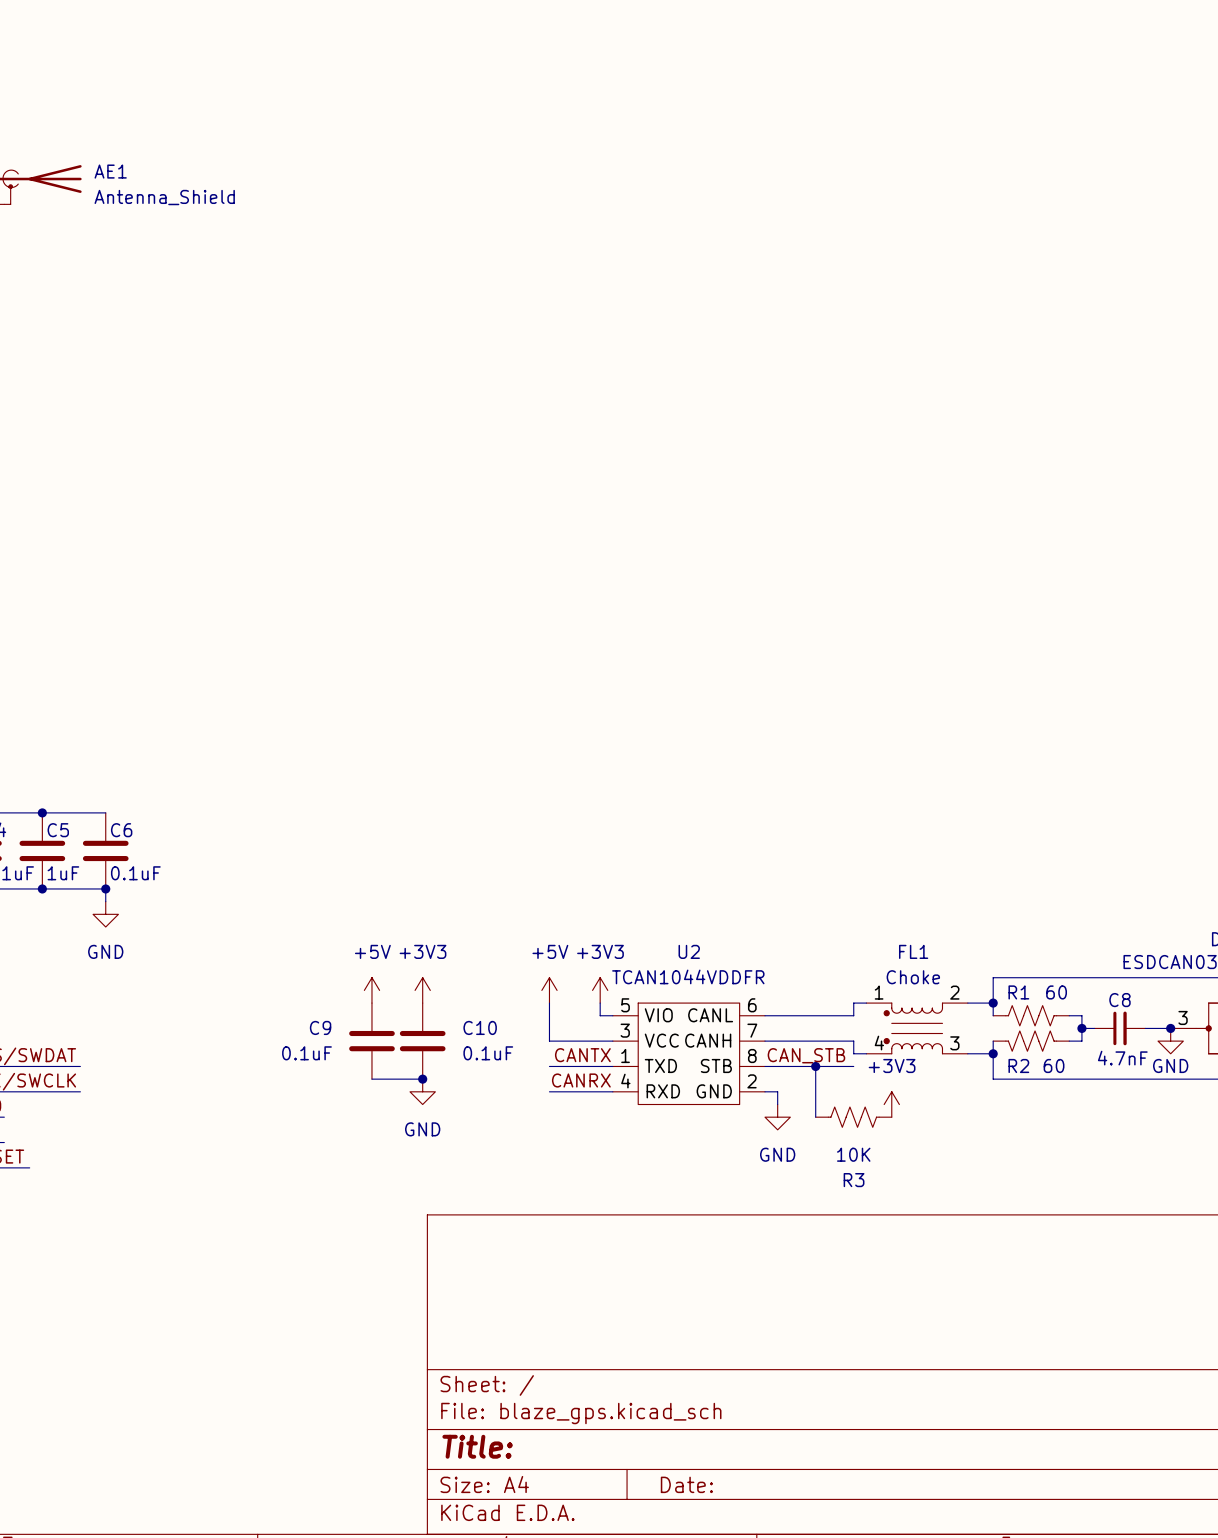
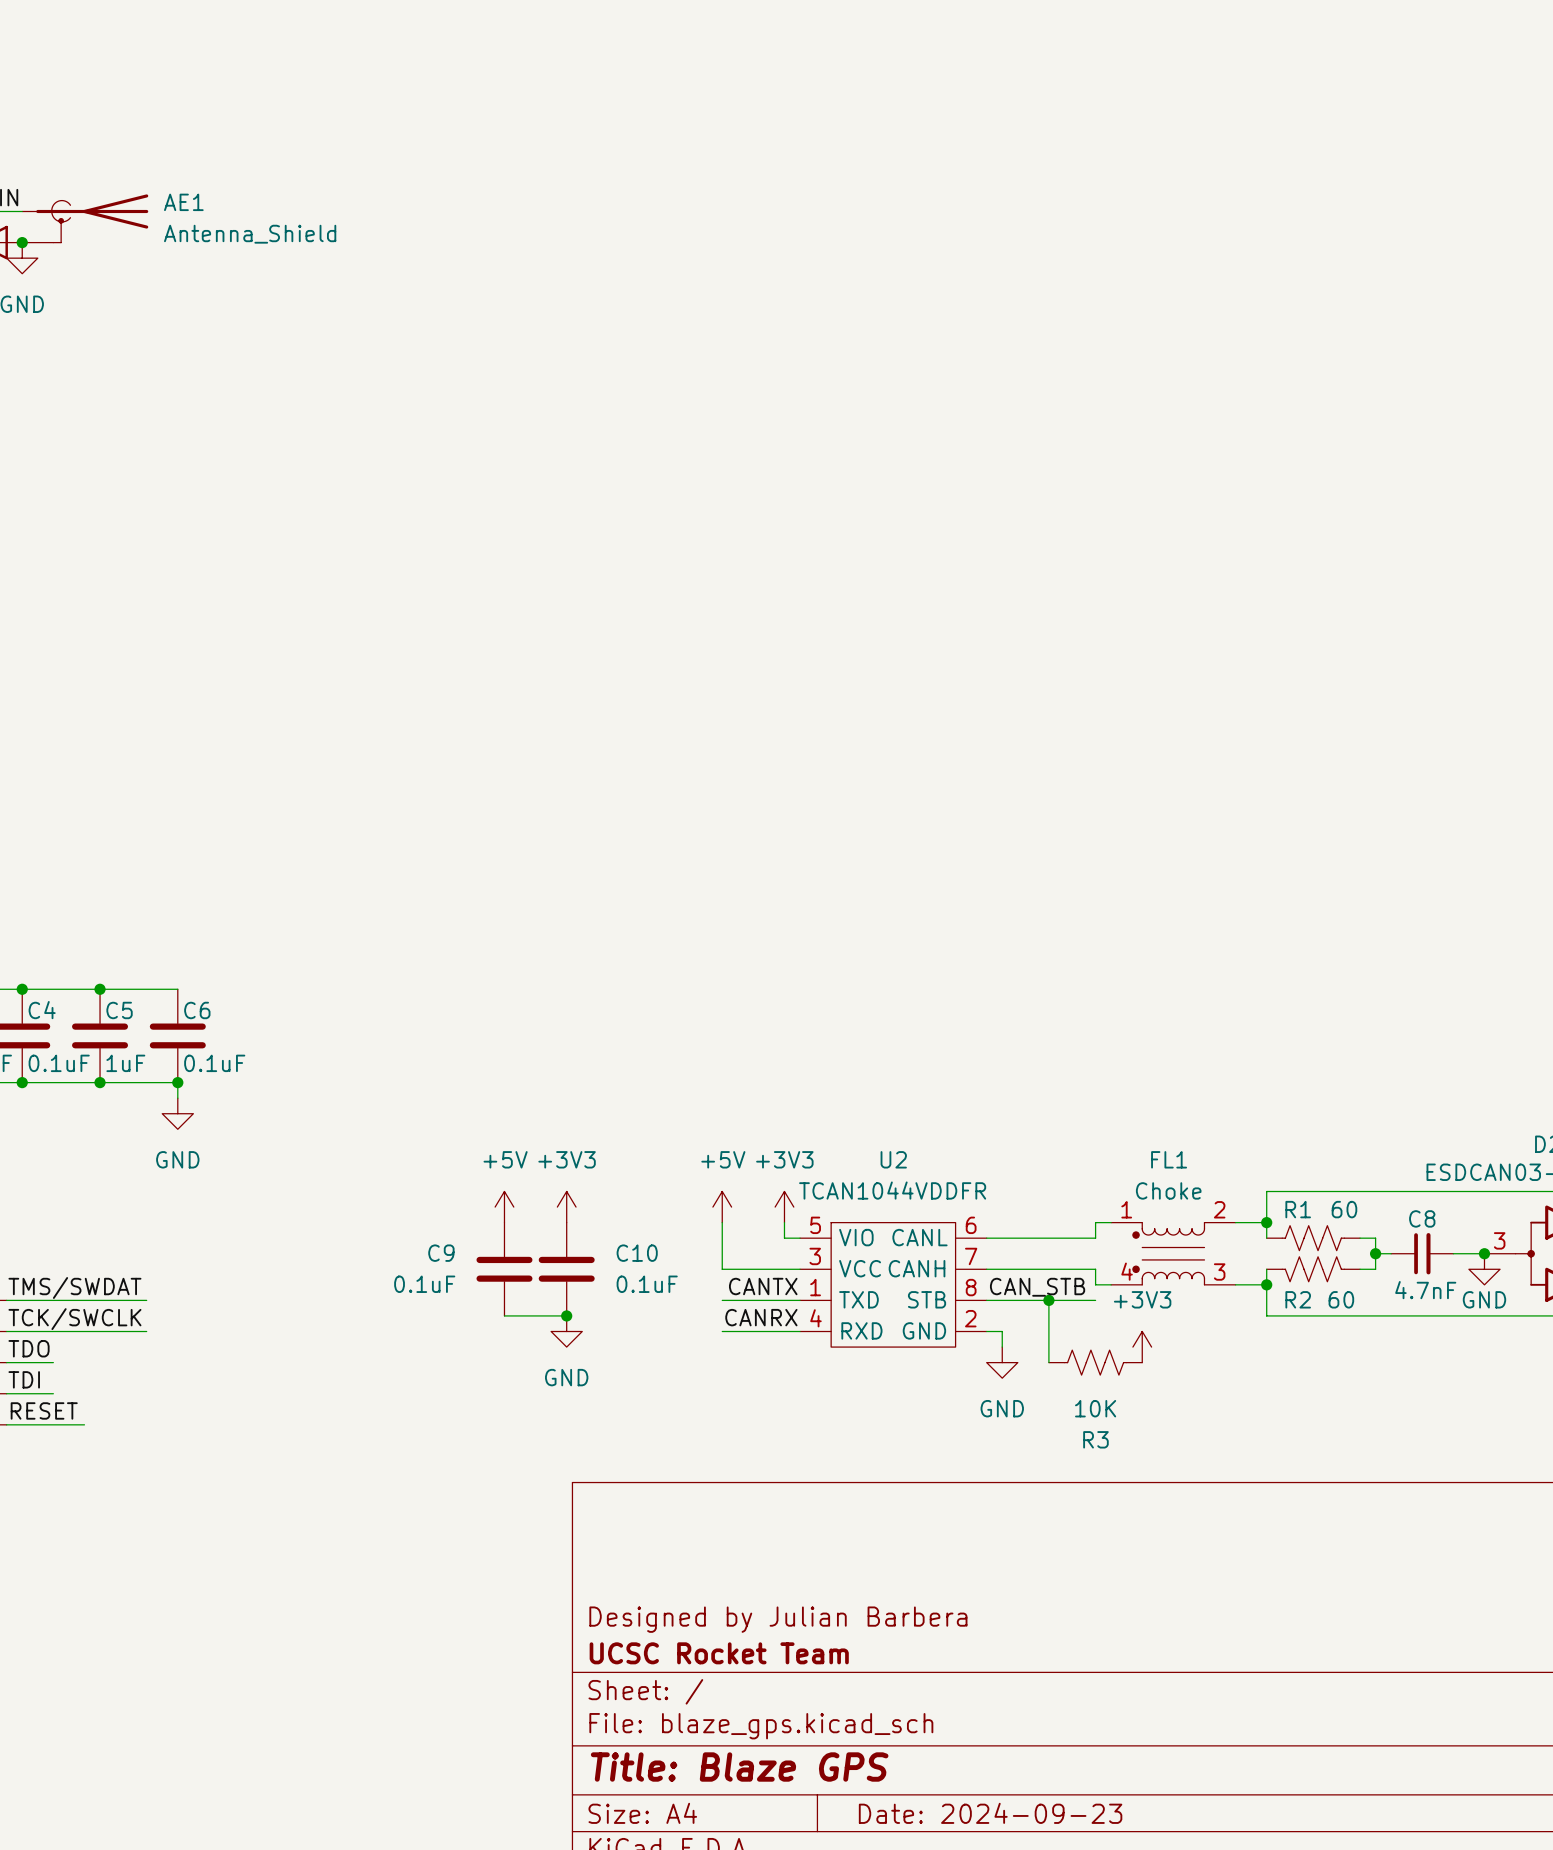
title block: none -> Designed by Julian Barbera (778, 1619)
title block: none -> UCSC Rocket Team (719, 1653)
title block: Title: (477, 1446) -> Title: Blaze GPS (739, 1767)
title block: Date: (686, 1484) -> Date: 2024-09-23 (990, 1813)

